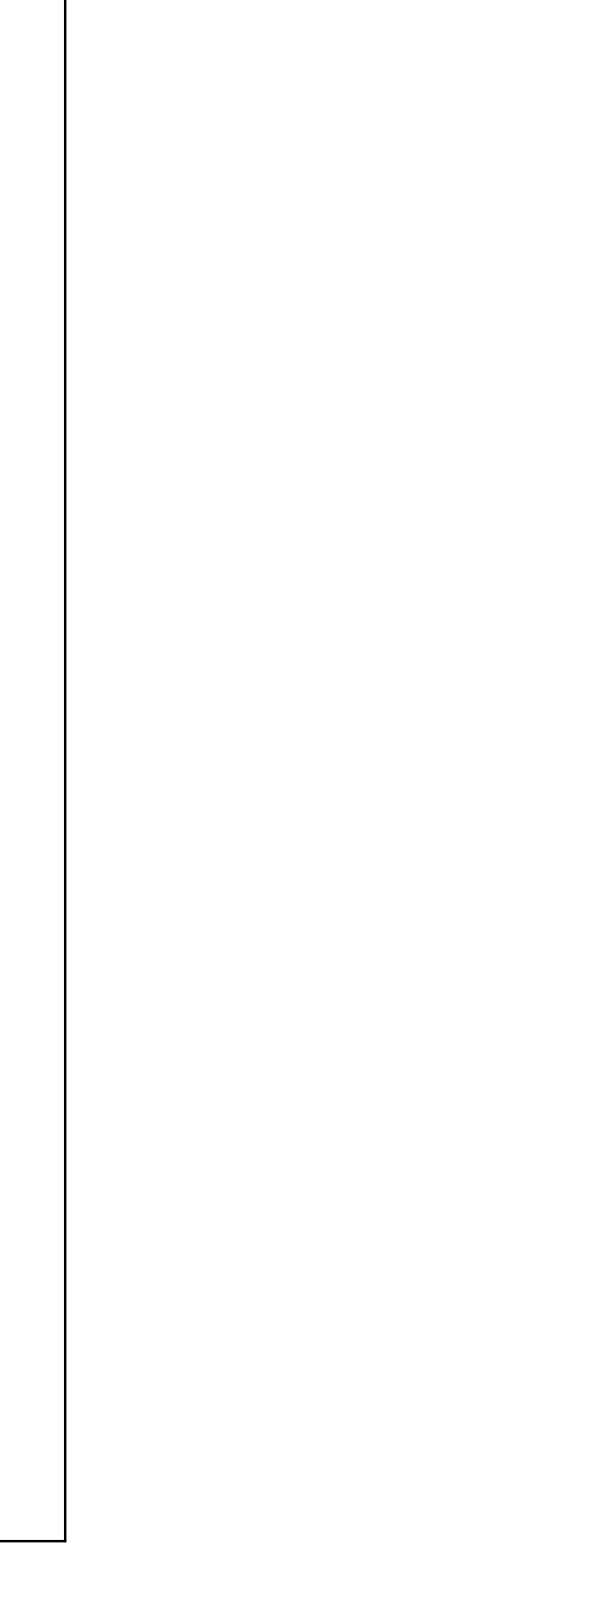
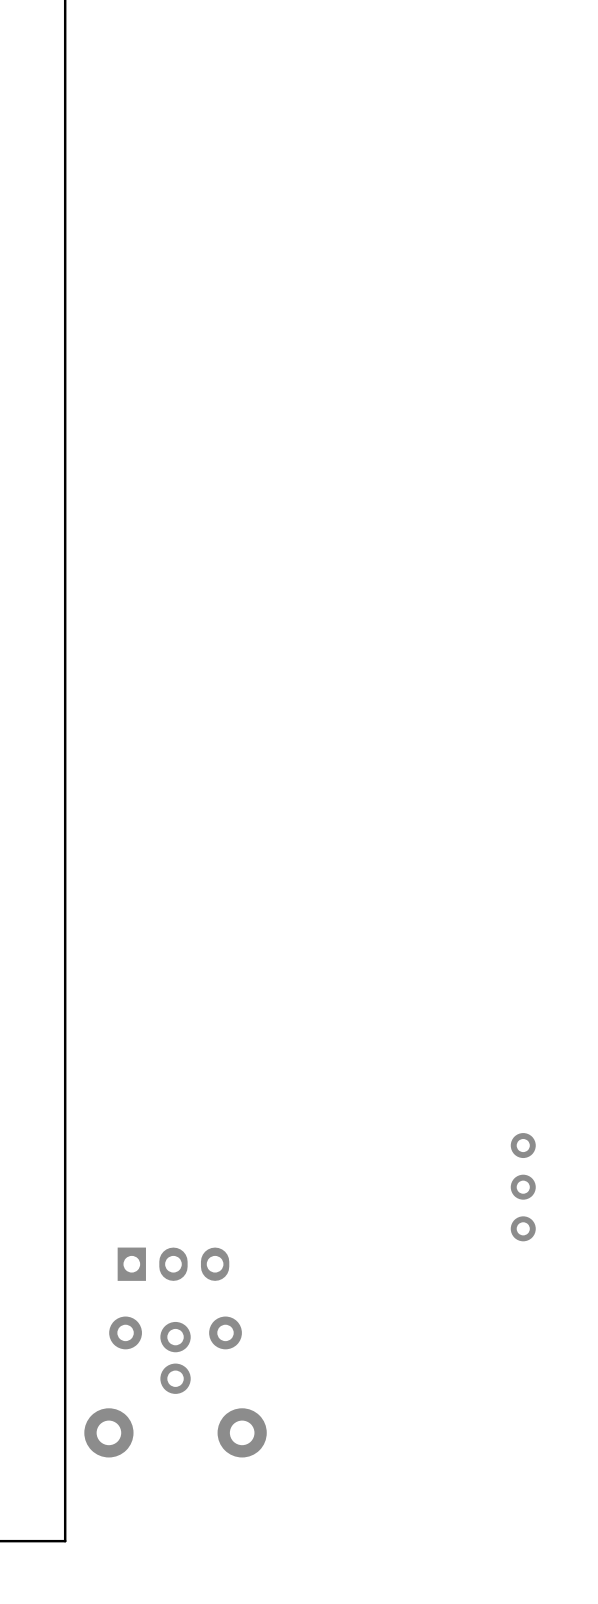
part: none -> (523, 1187)
part: none -> (173, 1264)
part: none -> (175, 1387)

